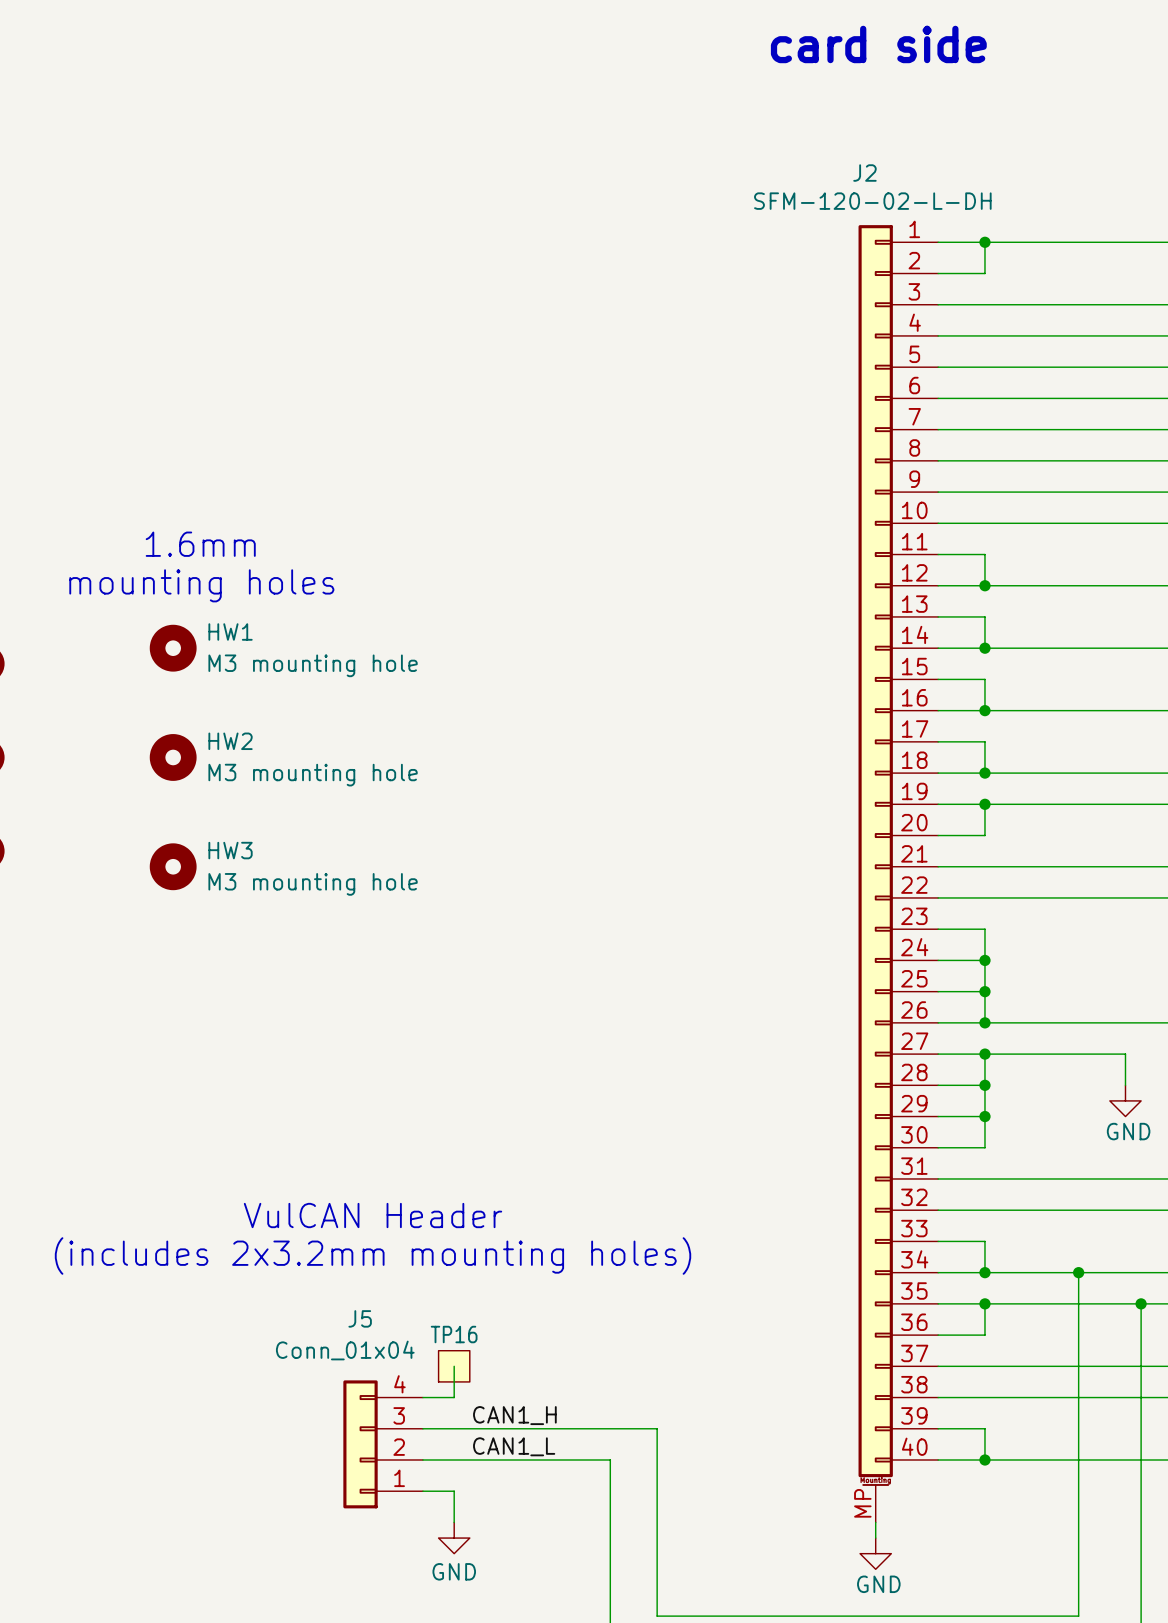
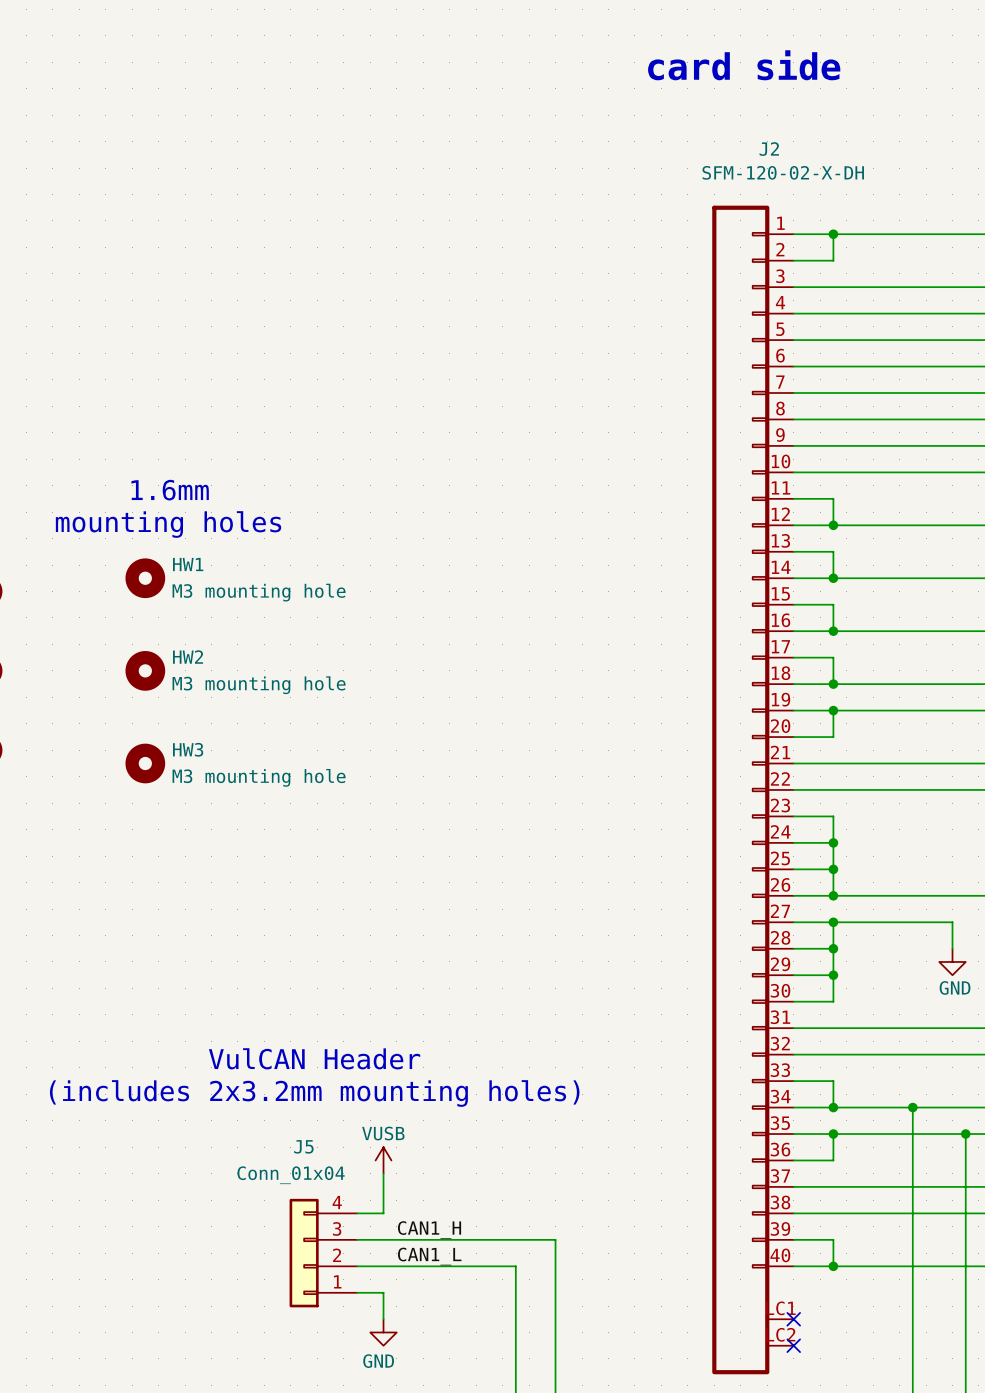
J2 name position: J2 (864, 173) -> J2 (769, 149)
J2 value: SFM-120-02-L-DH (872, 201) -> SFM-120-02-X-DH (783, 172)
J2 symbol: [858, 225, 939, 1523] -> [712, 205, 794, 1375]
power symbol: none -> VUSB (383, 1160)
TP16: (454, 1366) -> none
wire: (875, 1522) (875, 1538) -> none
no-connect mark: none -> (793, 1319)
power symbol: GND (875, 1553) -> none
no-connect mark: none -> (793, 1345)

